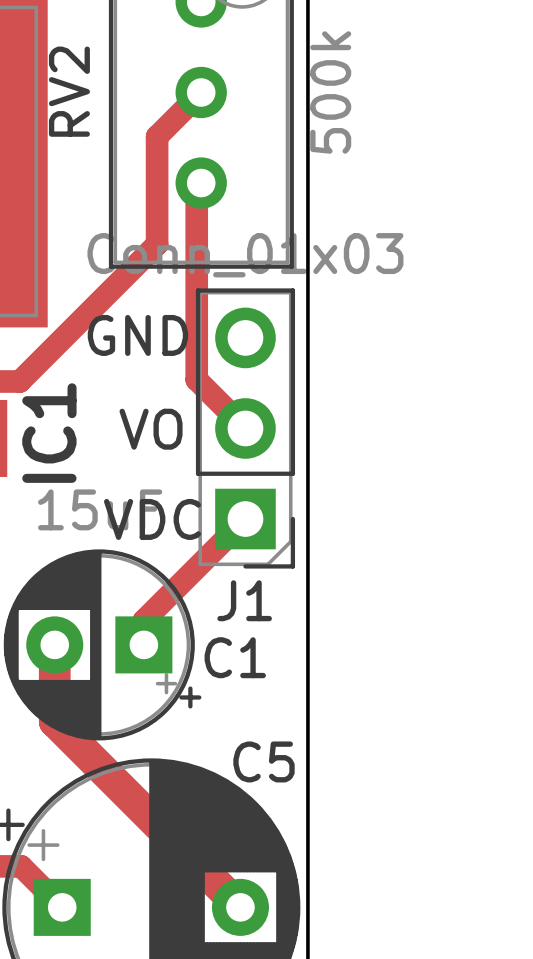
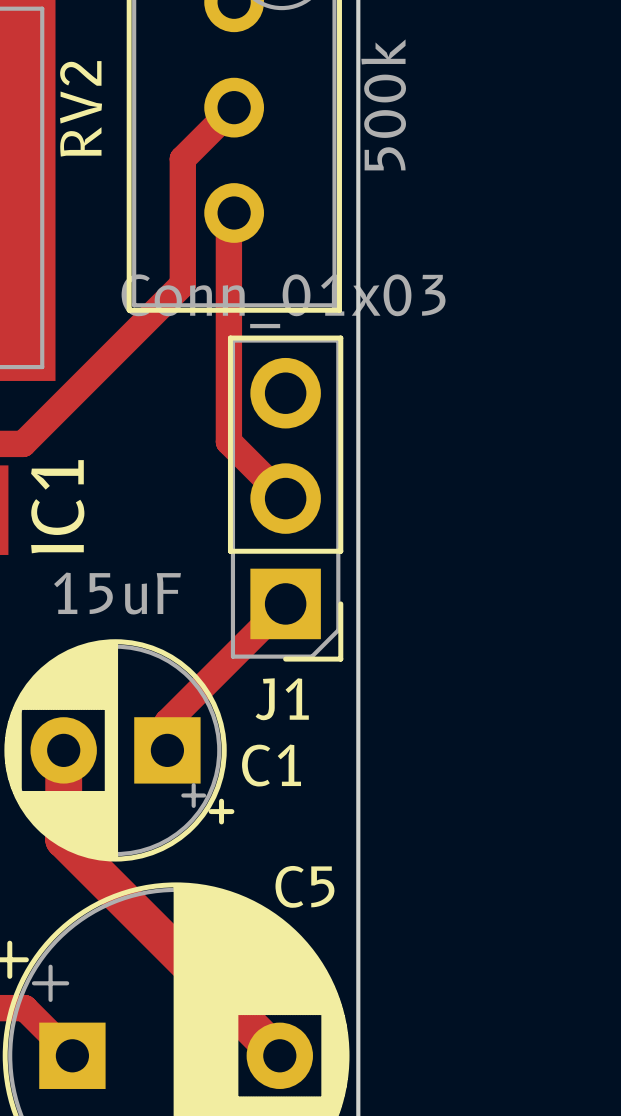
text: GND (137, 335) -> none
text: VO (151, 429) -> none
text: VDC (152, 519) -> none

